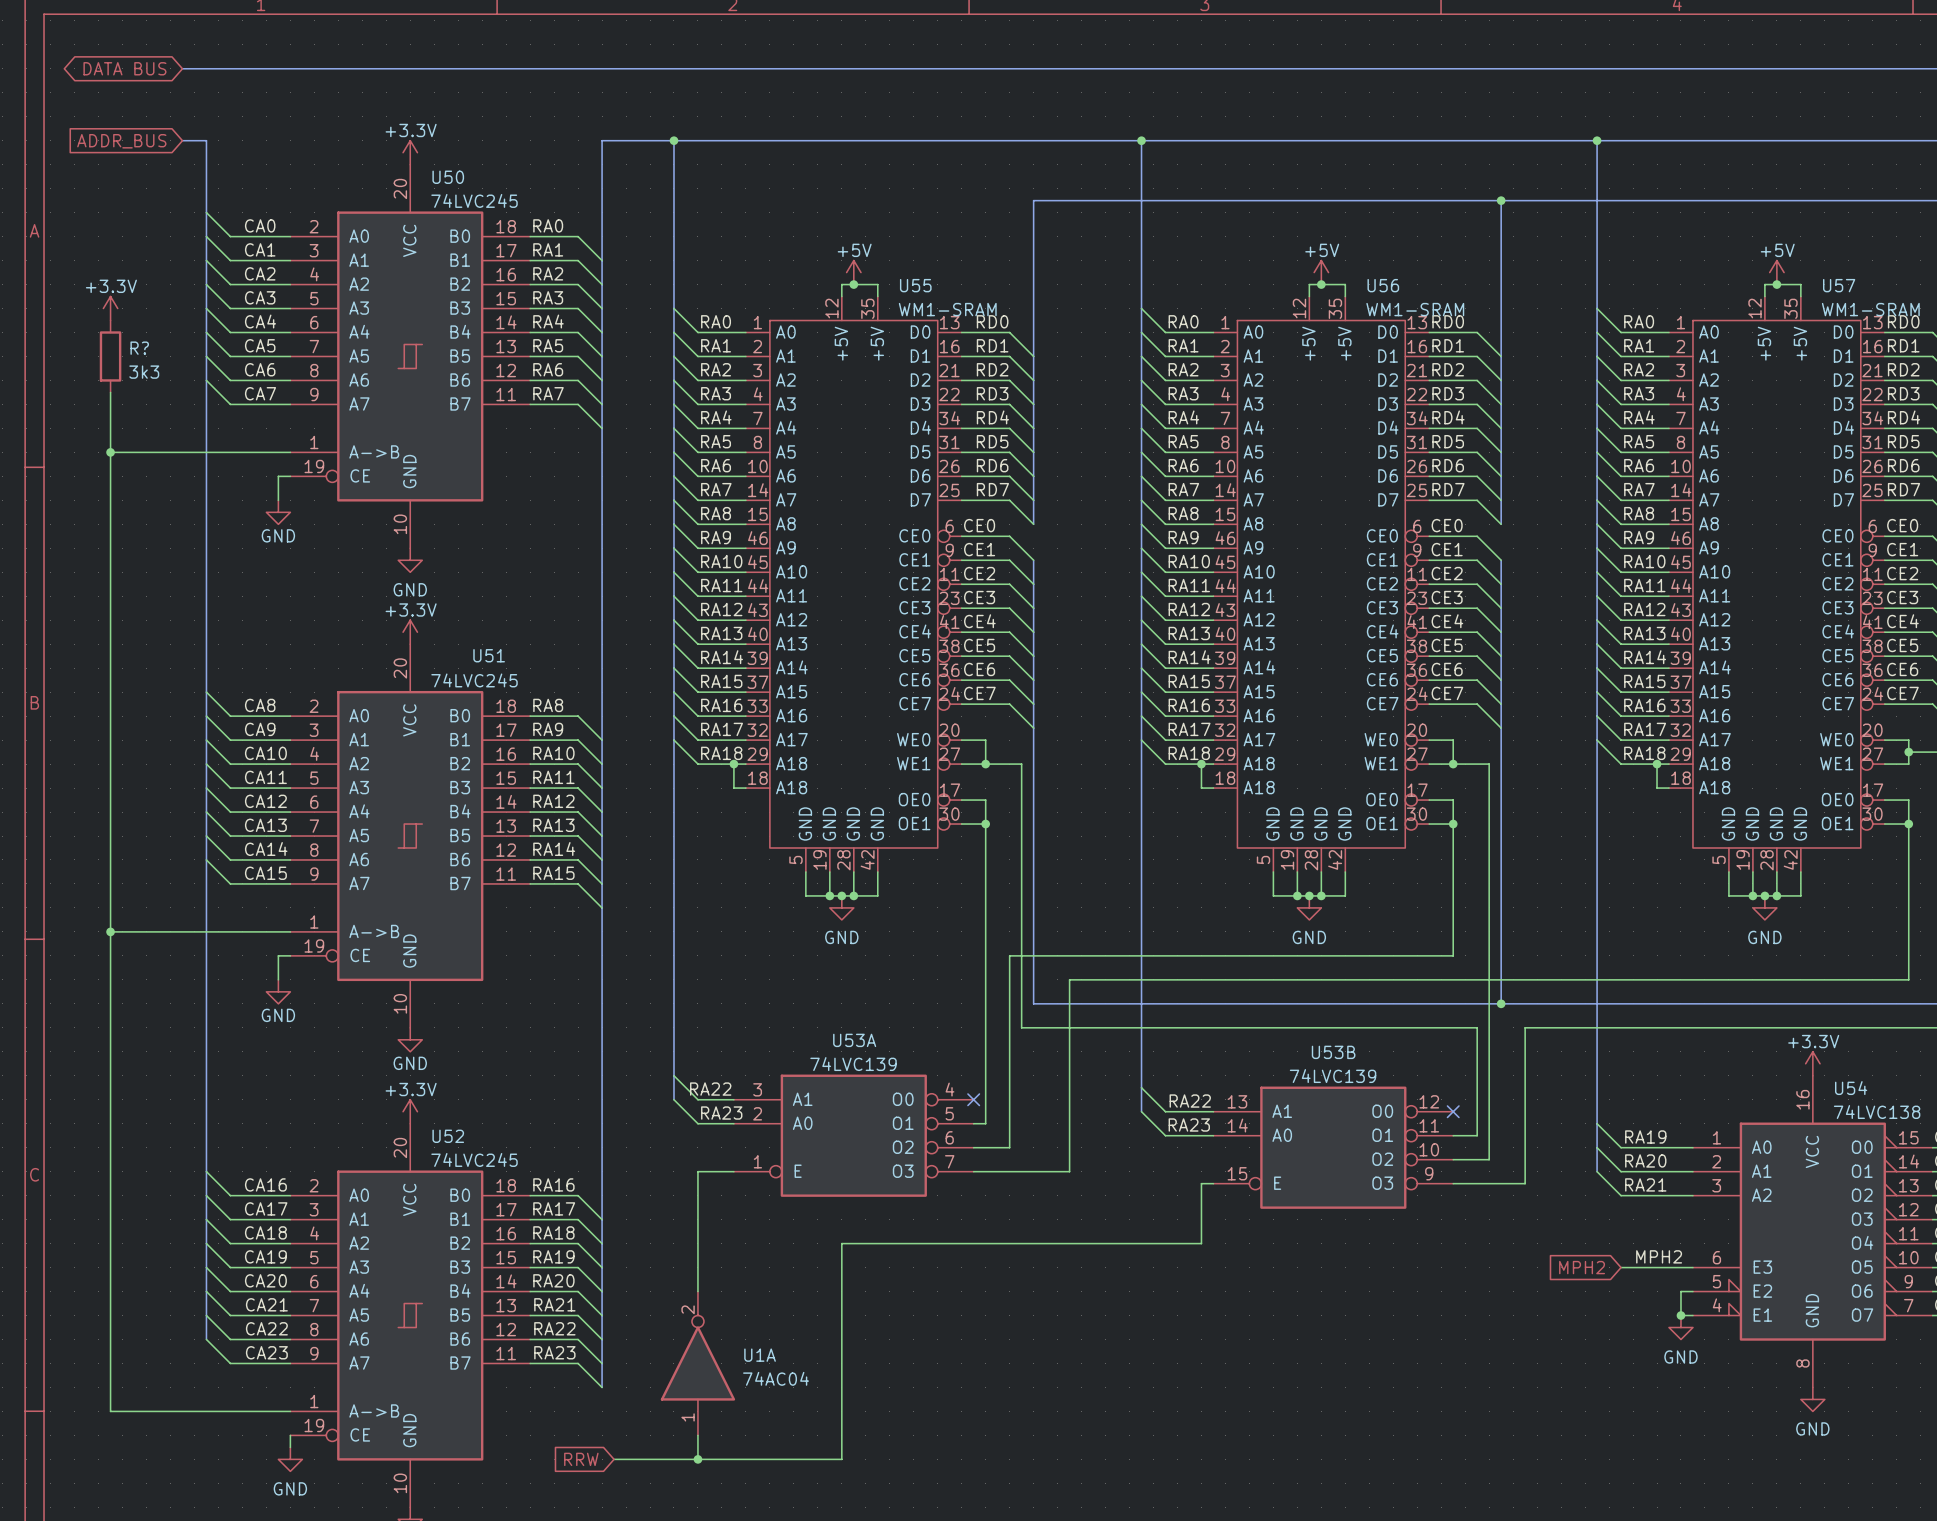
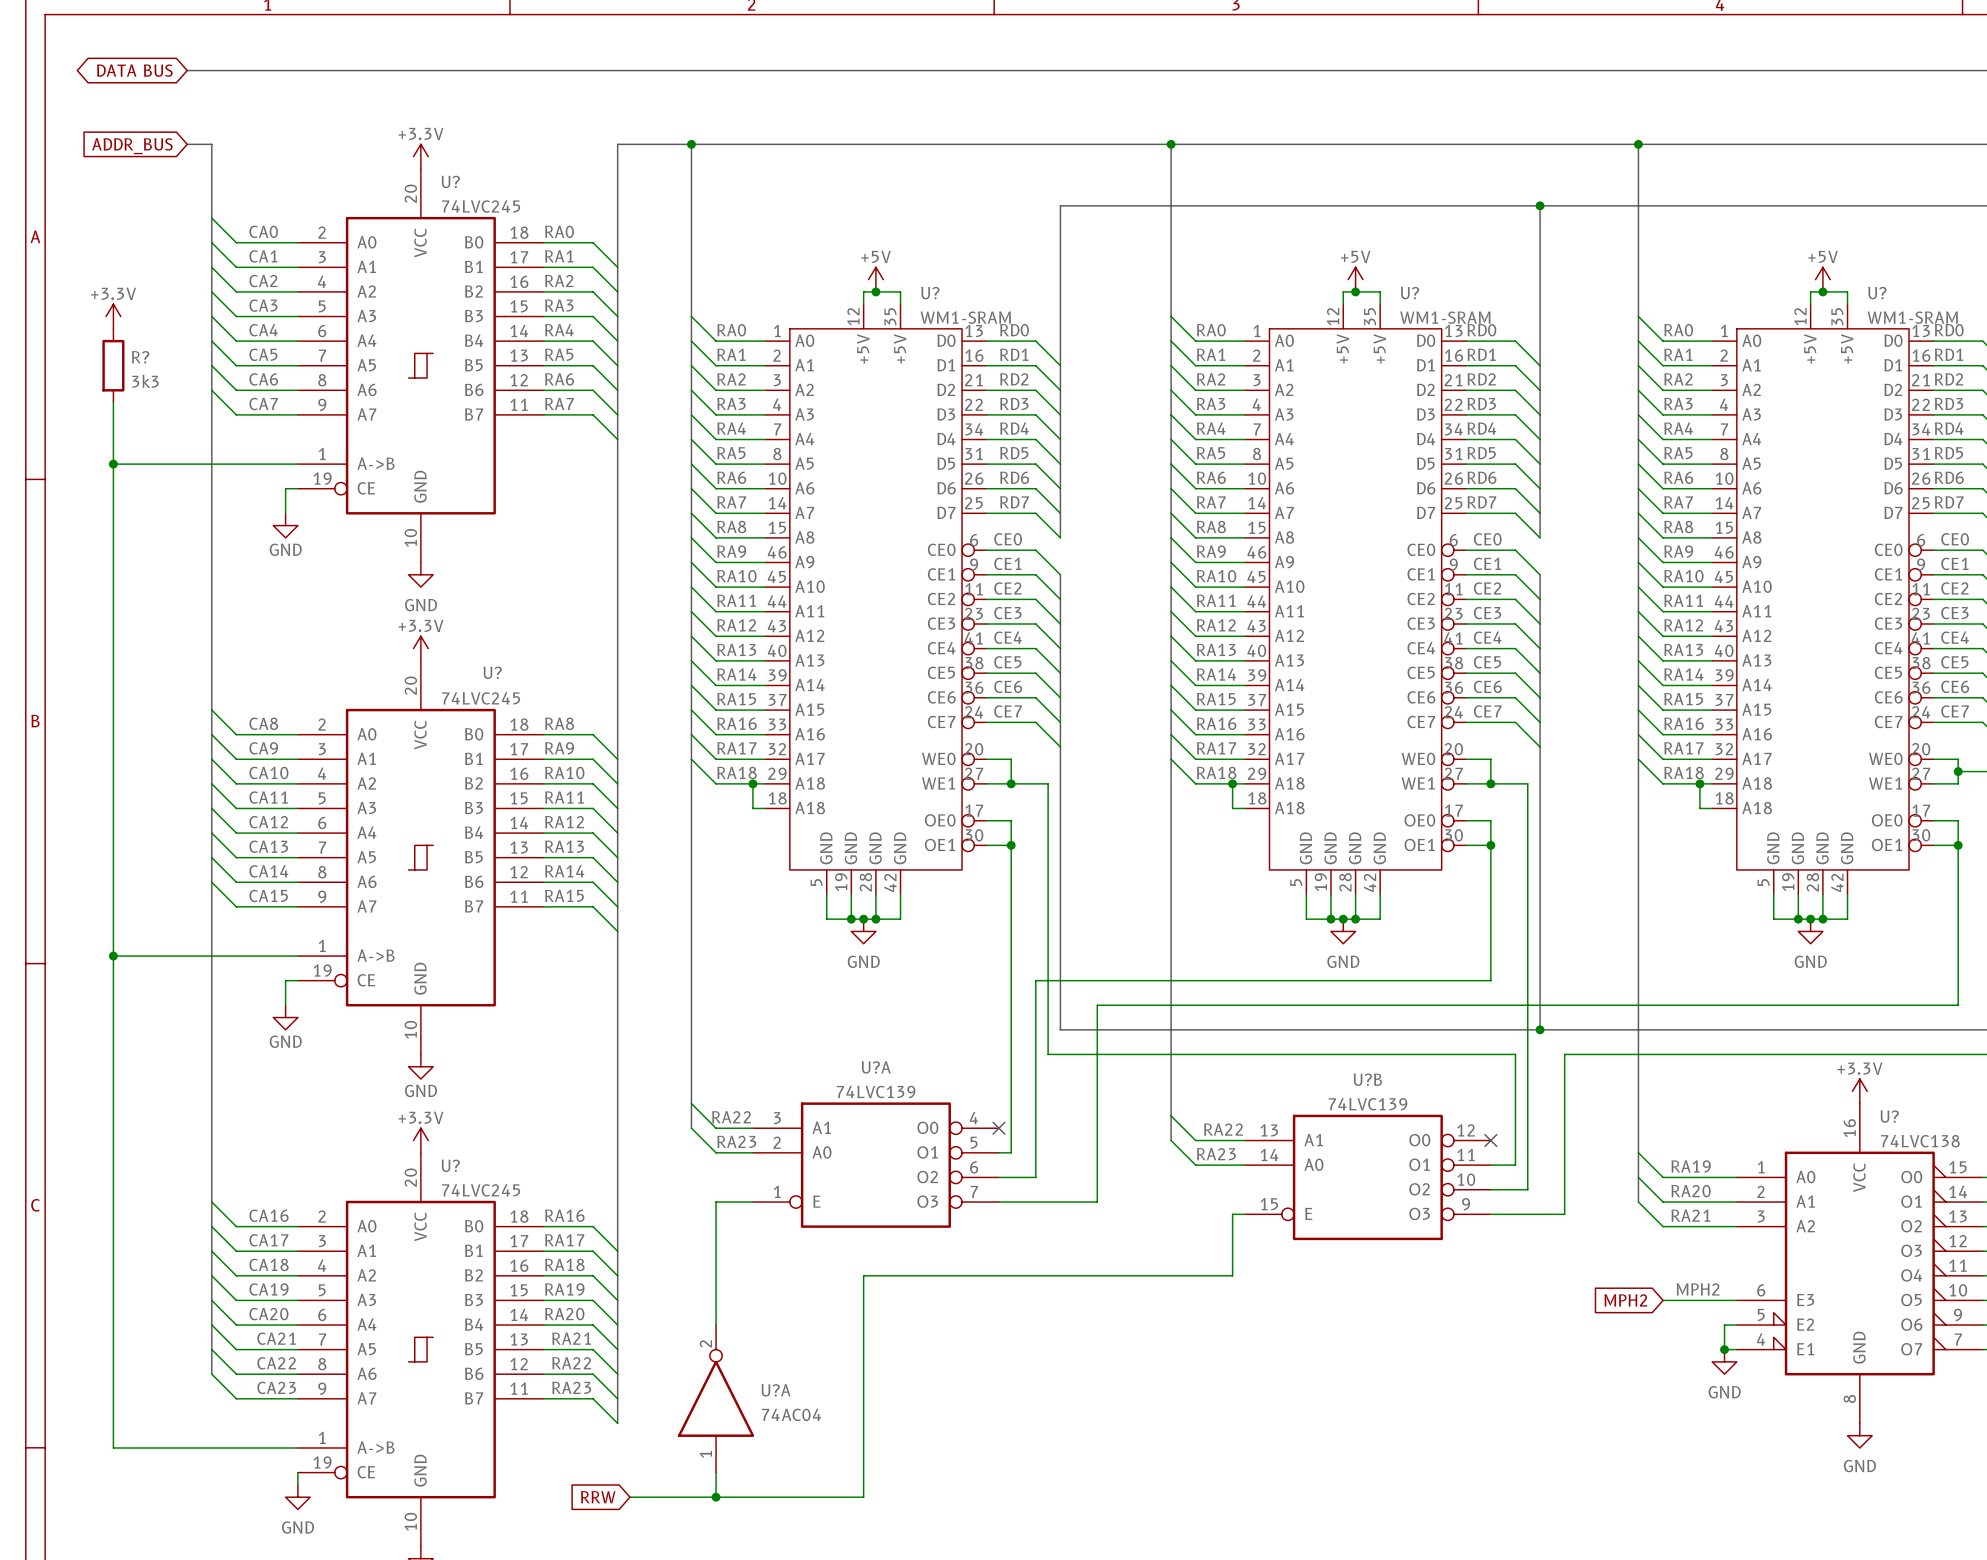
U50 name: U50 (448, 177) -> U? (450, 181)
U55 name: U55 (915, 285) -> U? (930, 293)
U56 name: U56 (1383, 285) -> U? (1410, 293)
U57 name: U57 (1839, 285) -> U? (1877, 293)
U51 name: U51 (489, 655) -> U? (492, 672)
U53A name: U53A (854, 1040) -> U?A (876, 1067)
U53B name: U53B (1333, 1052) -> U?B (1367, 1079)
U54 name: U54 (1851, 1088) -> U? (1889, 1116)
U52 name: U52 (448, 1136) -> U? (450, 1165)
U1A name: U1A (760, 1355) -> U?A (776, 1390)

